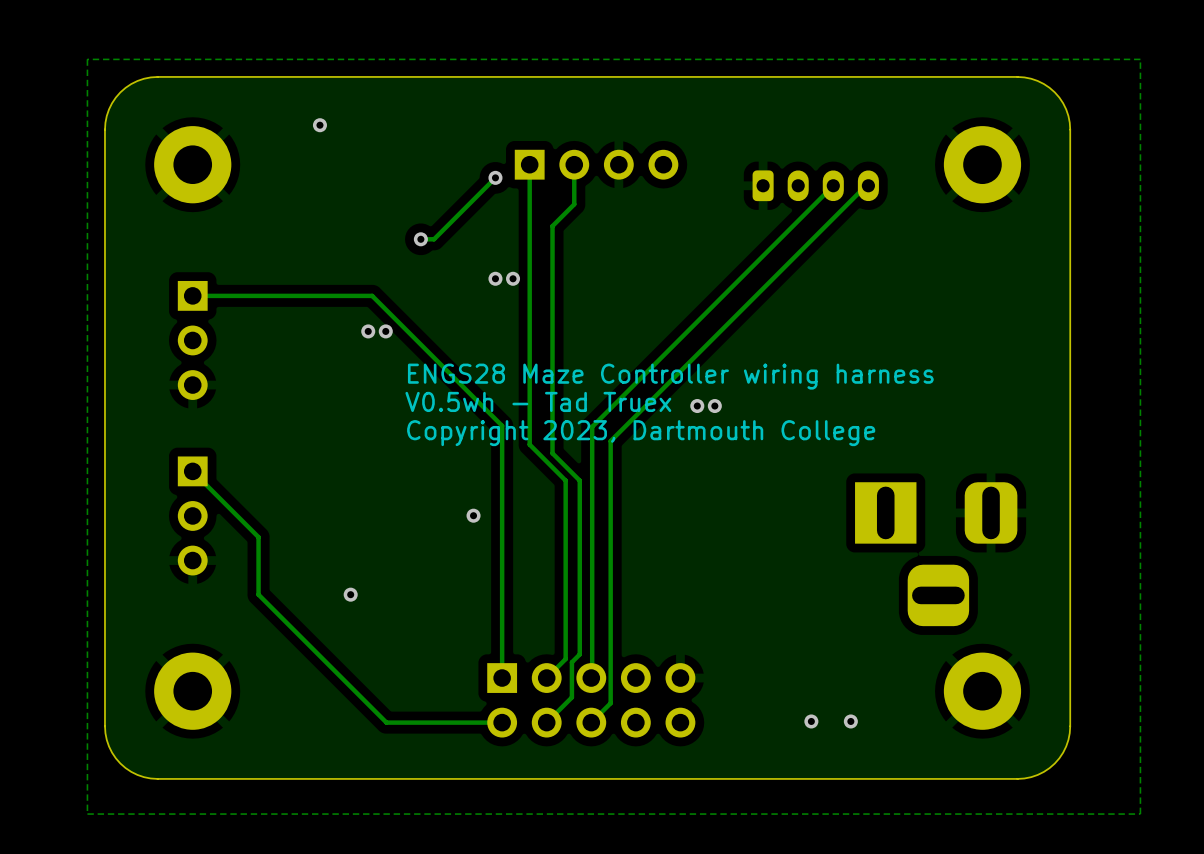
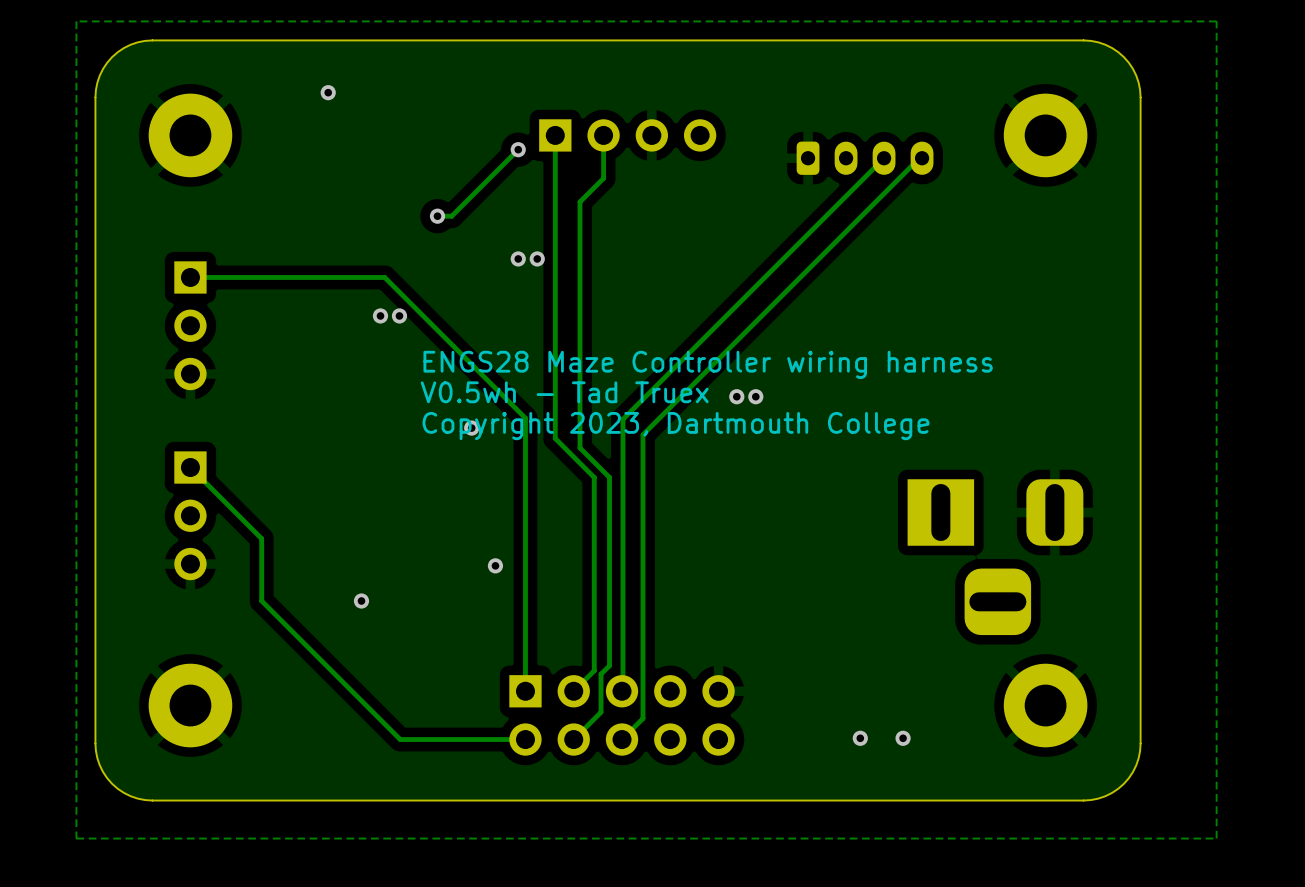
via: none -> (471, 428)
via: (473, 515) -> none
via: none -> (495, 565)

